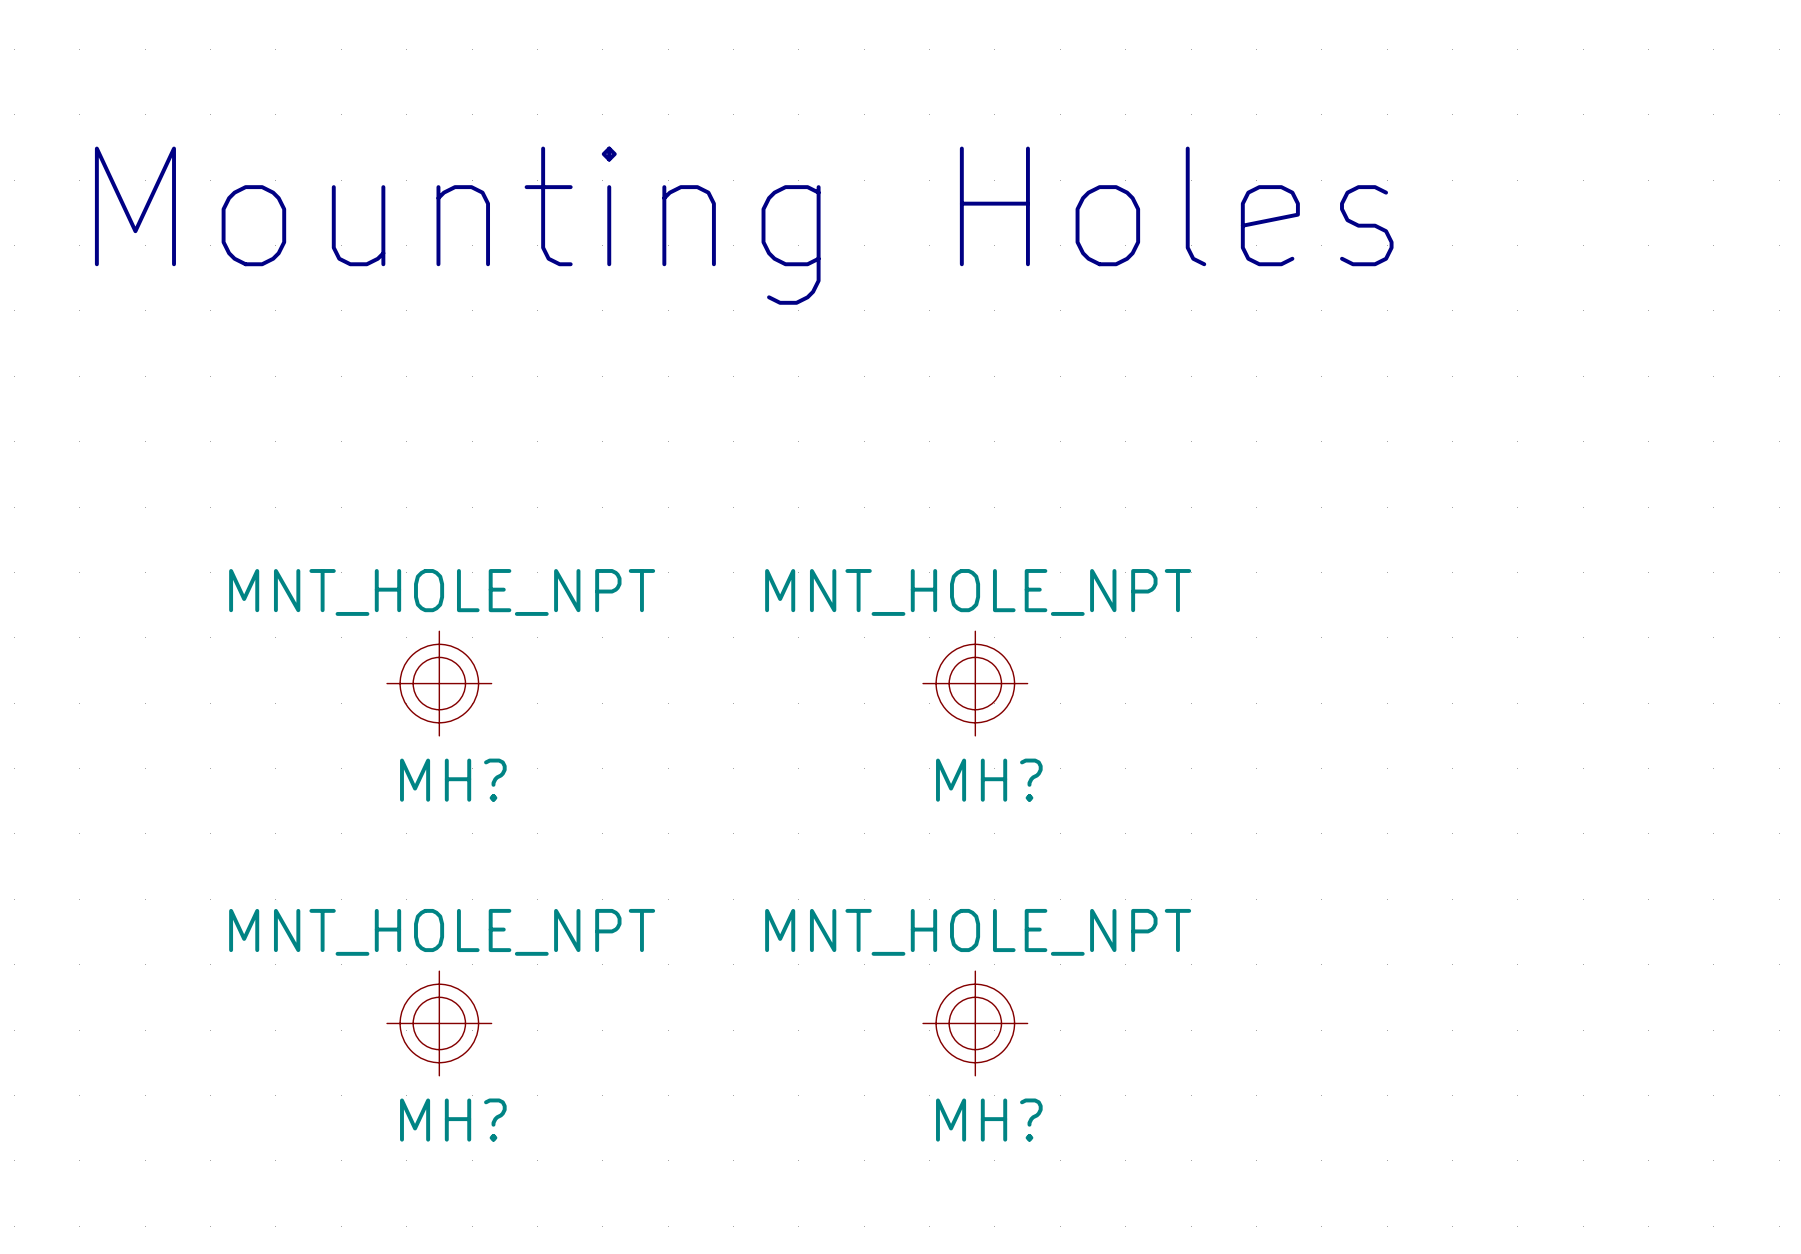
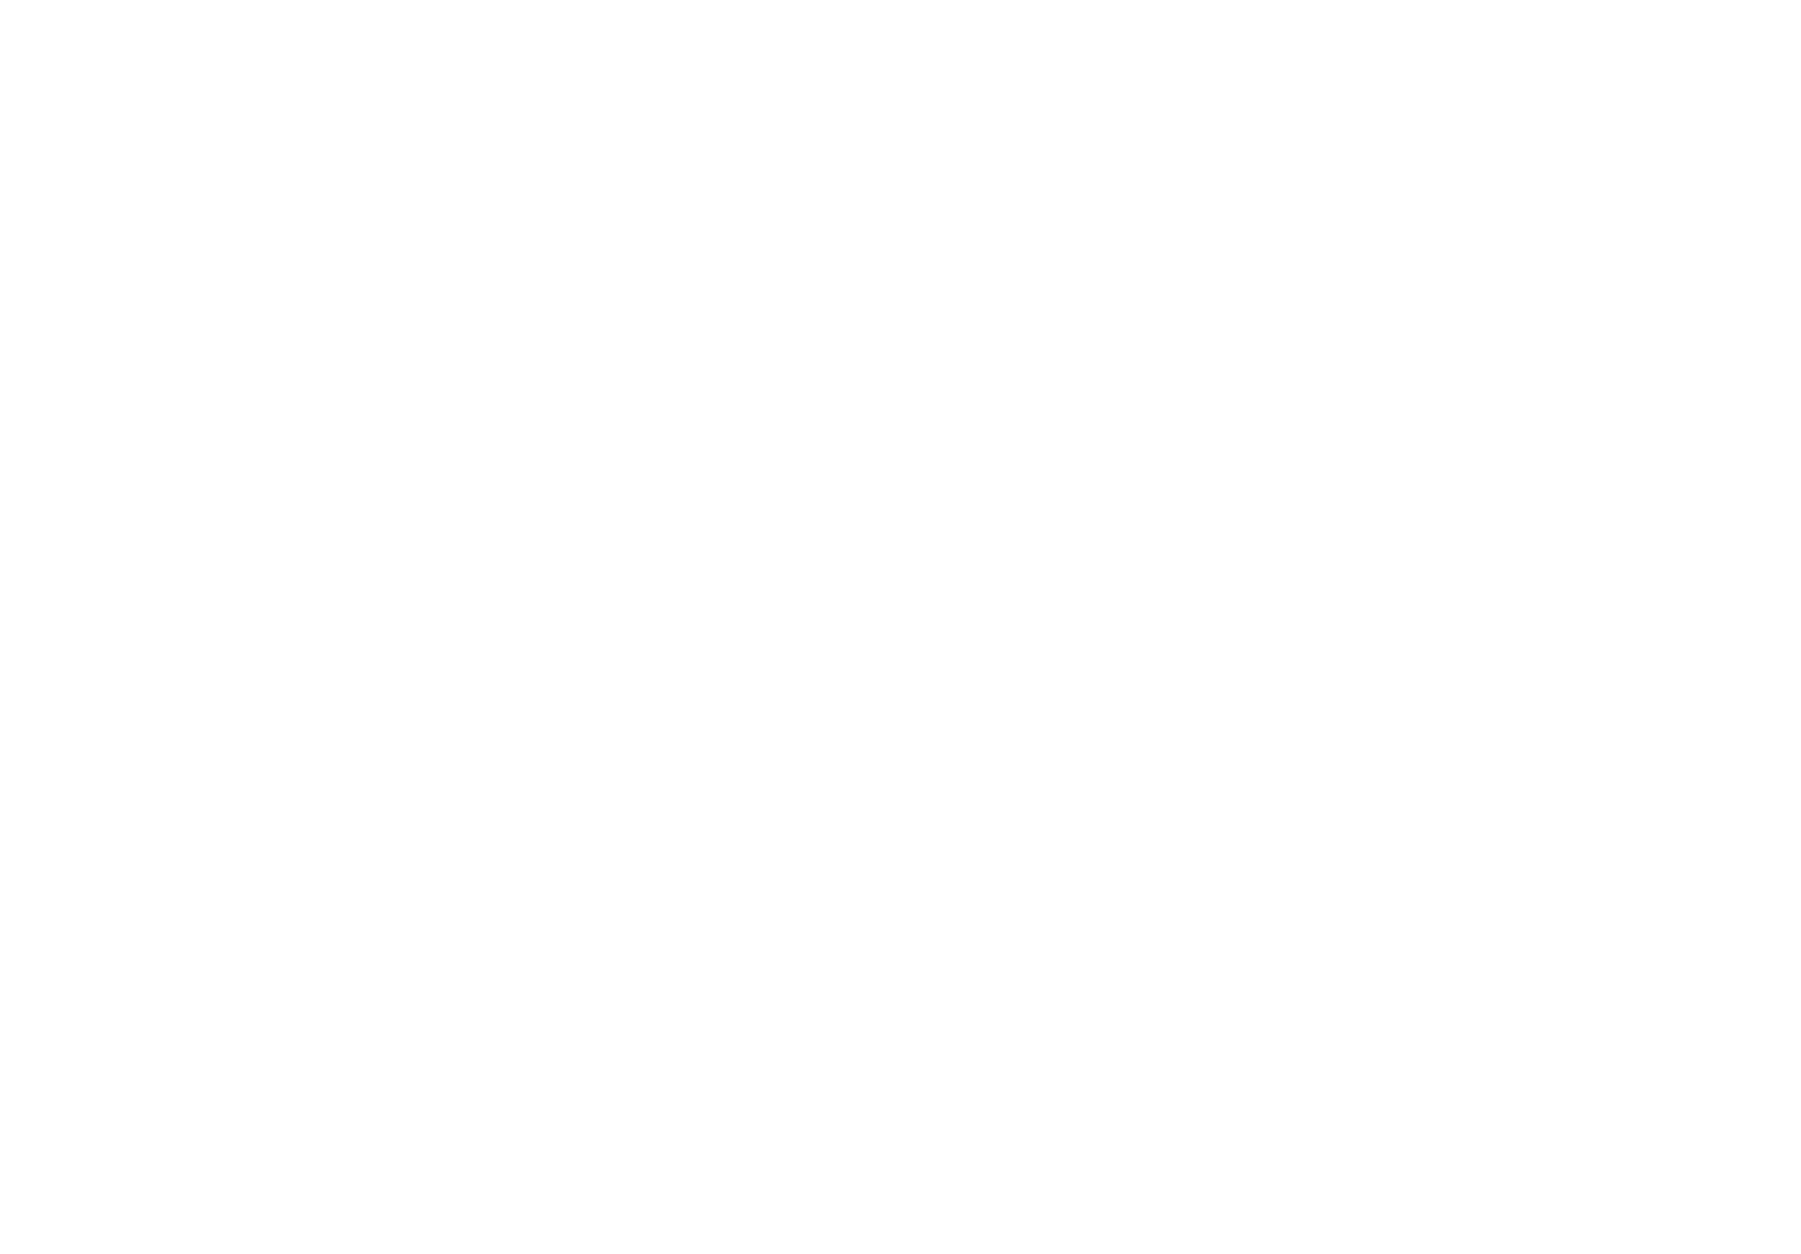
text: Mounting Holes (744, 225) -> none
MH?: MNT_HOLE_NPT (439, 683) -> none
MH?: MNT_HOLE_NPT (975, 683) -> none
MH?: MNT_HOLE_NPT (439, 1023) -> none
MH?: MNT_HOLE_NPT (975, 1023) -> none

